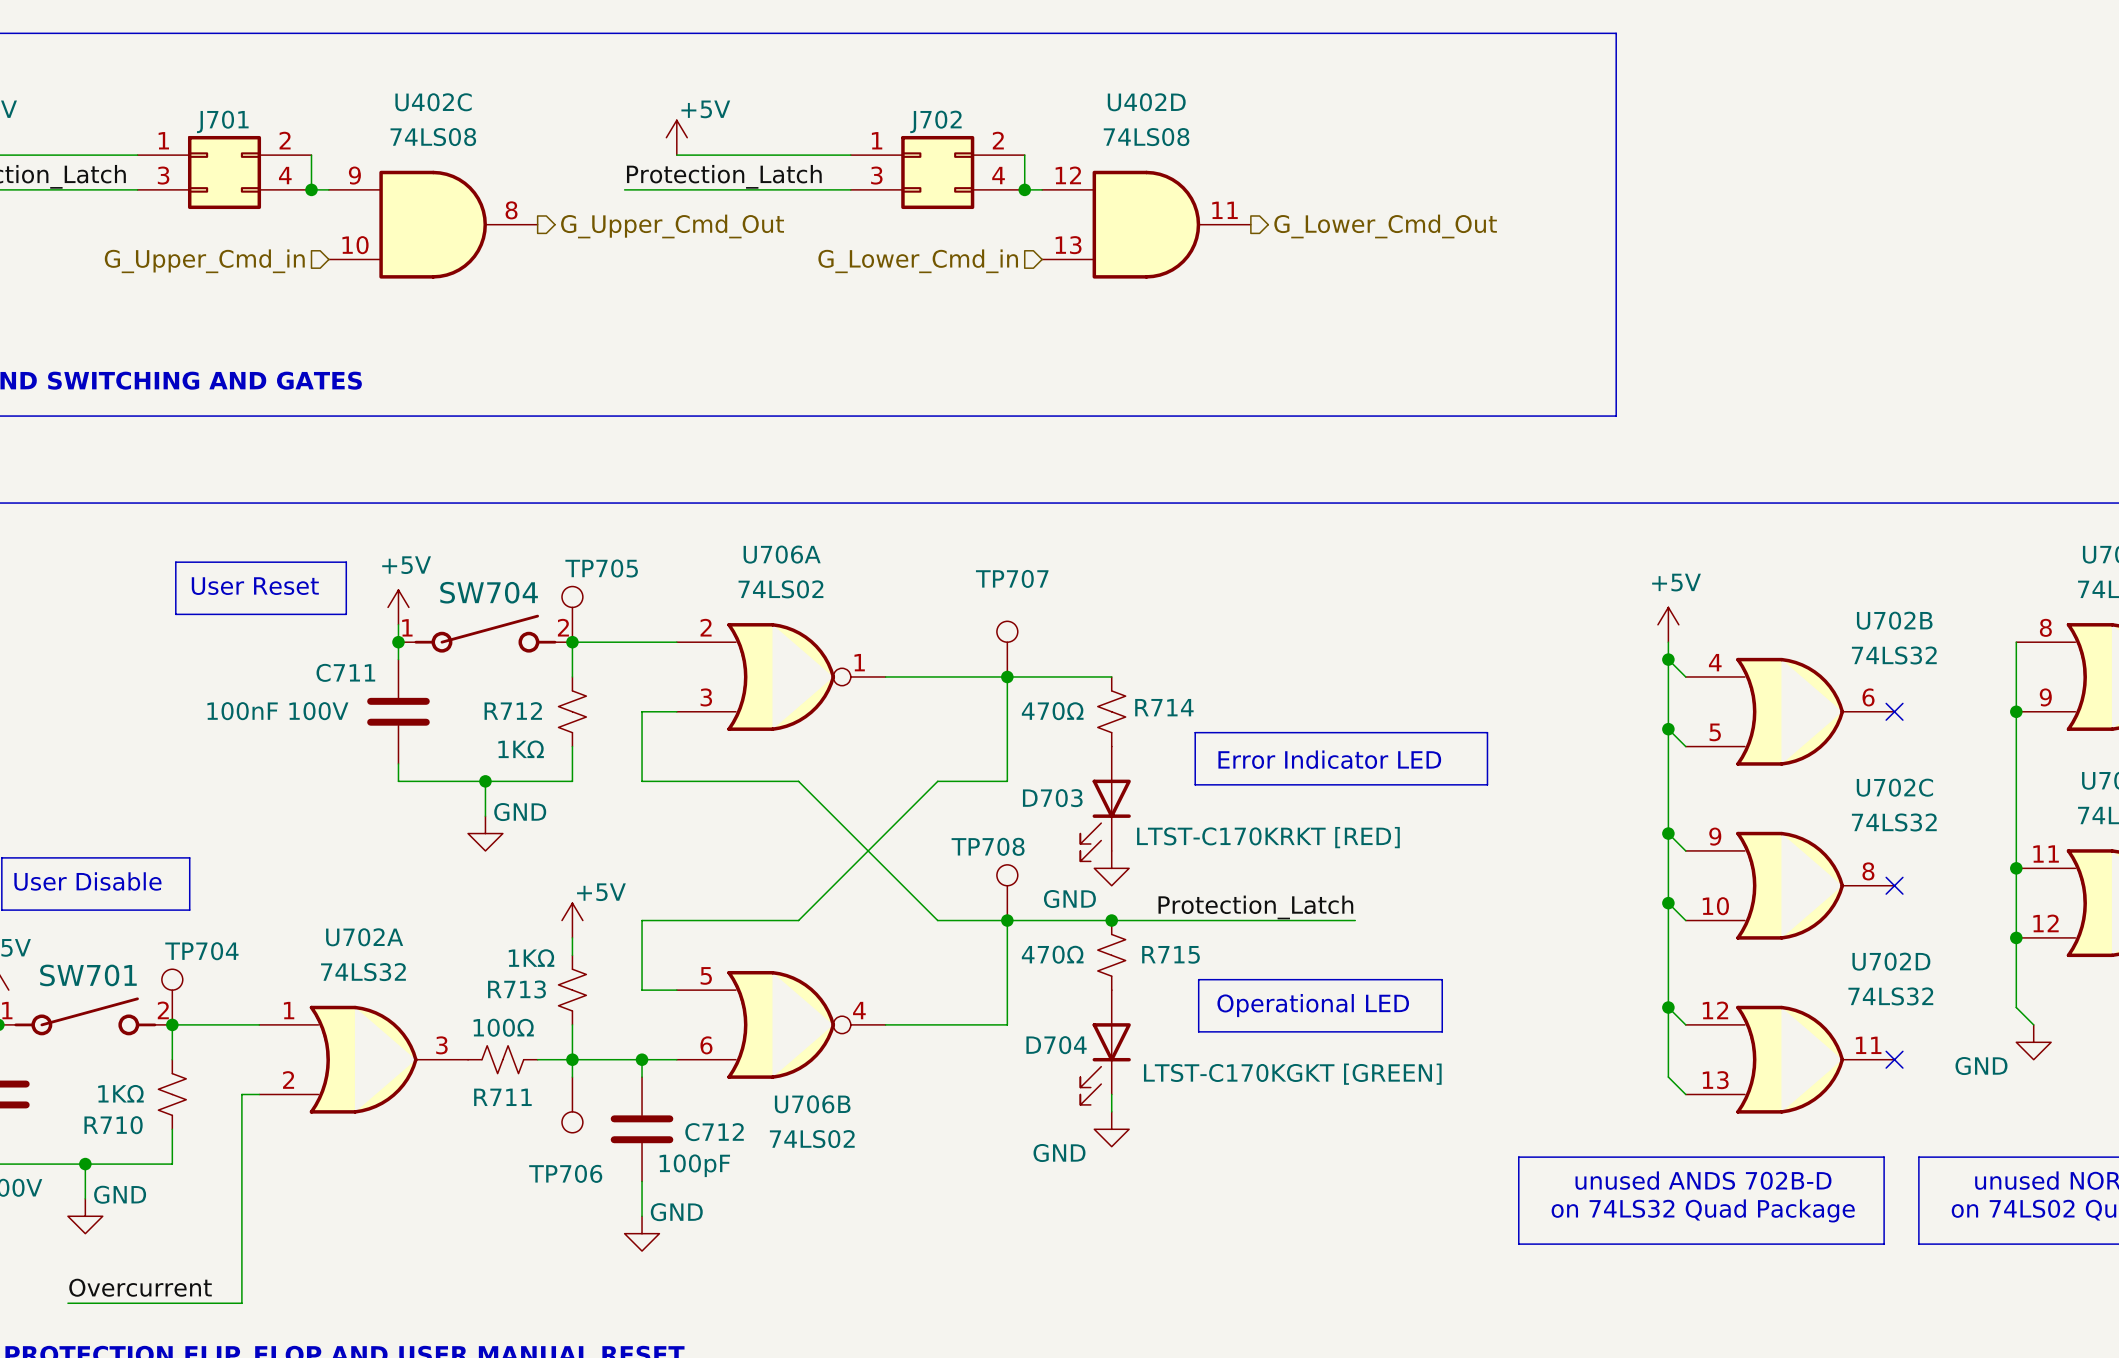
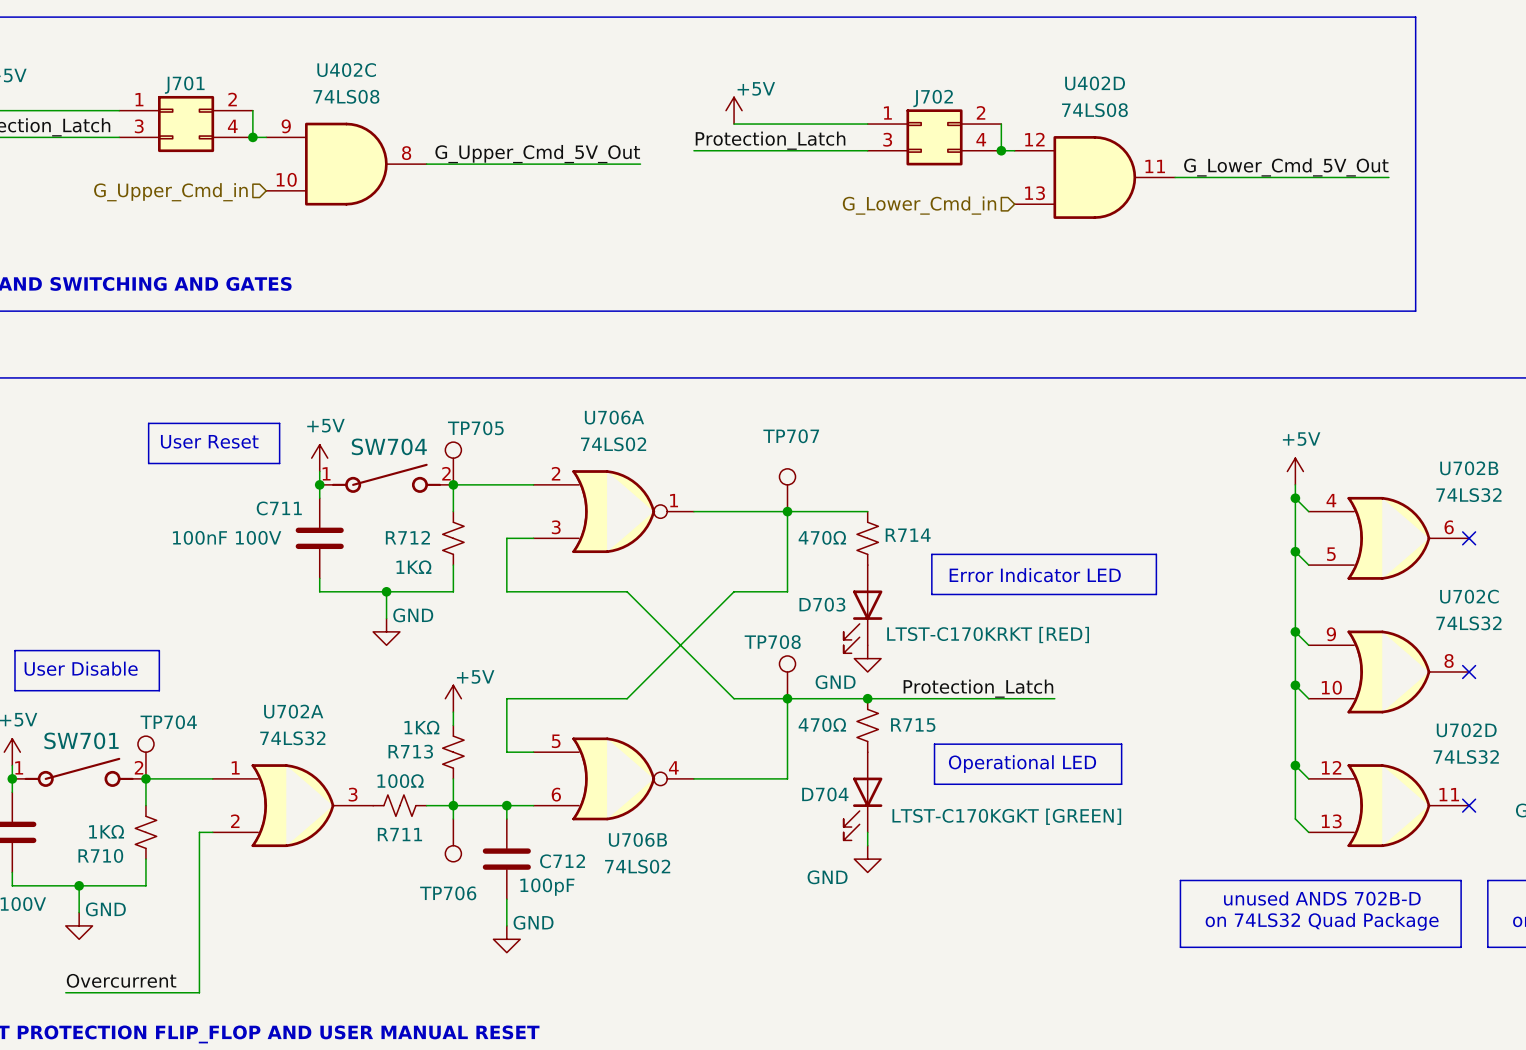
line: (1616, 33) (1616, 416) -> (1255, 17) (1415, 17) (1415, 311) (1255, 311)
power symbol position: +5V (676, 137) -> +5V (734, 110)
wire: (676, 155) (850, 155) -> (734, 124) (867, 124)
wire: (1024, 155) (1024, 189) (1042, 189) -> (1001, 124) (1001, 150) (1014, 150)
J702 position: (937, 172) -> (934, 137)
label position: Protection_Latch (724, 176) -> Protection_Latch (770, 140)
wire: (624, 189) (850, 189) -> (693, 150) (867, 150)
junction: (1024, 189) -> none
junction: none -> (1001, 150)
label: none -> G_Upper_Cmd_5V_Out (537, 154)
wire: none -> (426, 164) (640, 164)
U402D position: (1146, 224) -> (1094, 177)
hierarchical label: G_Upper_Cmd_Out (672, 226) -> none
hierarchical label: G_Lower_Cmd_Out (1385, 226) -> none
label: none -> G_Lower_Cmd_5V_Out (1286, 167)
wire: none -> (1175, 177) (1388, 177)
hierarchical label position: G_Lower_Cmd_in (918, 261) -> G_Lower_Cmd_in (919, 205)

